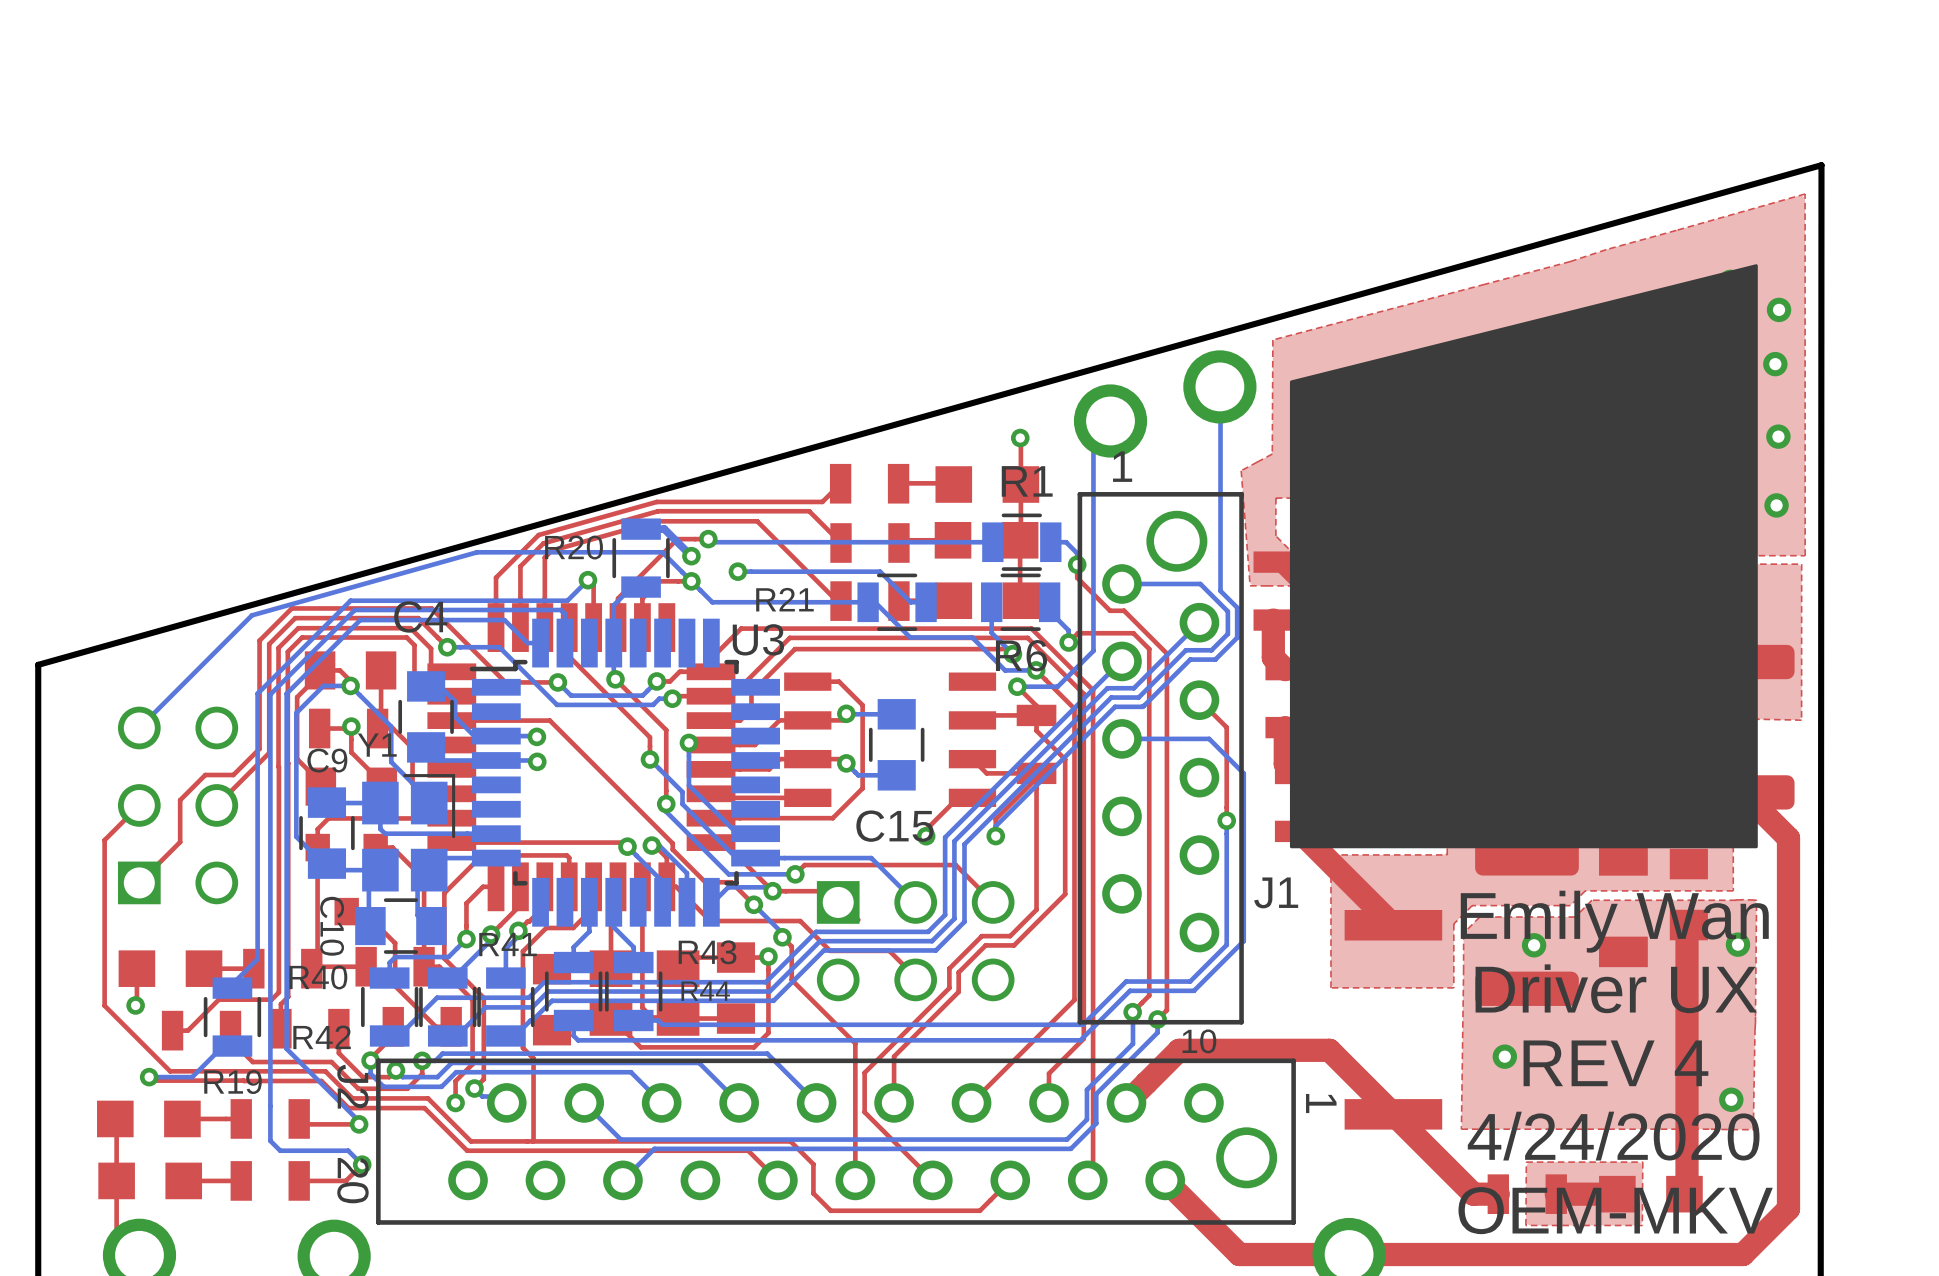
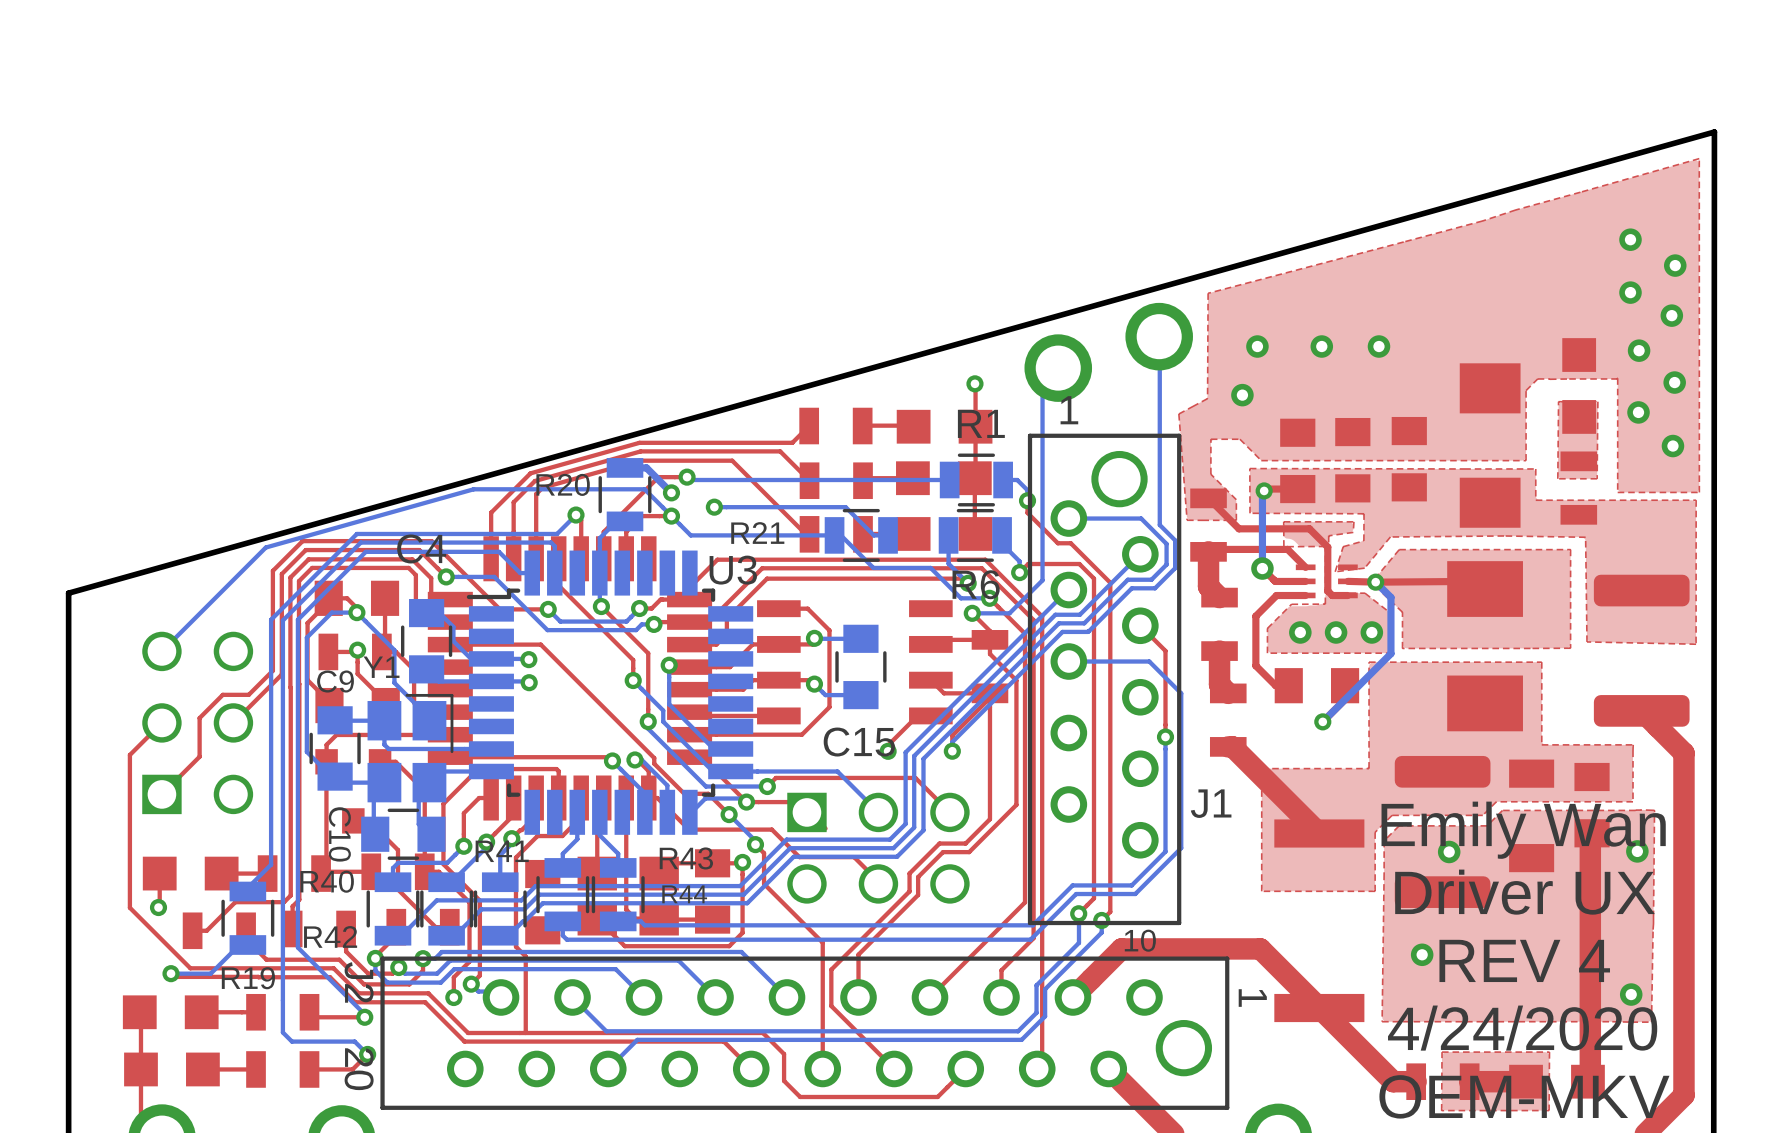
drawing: [1289, 264, 1758, 849] -> none

